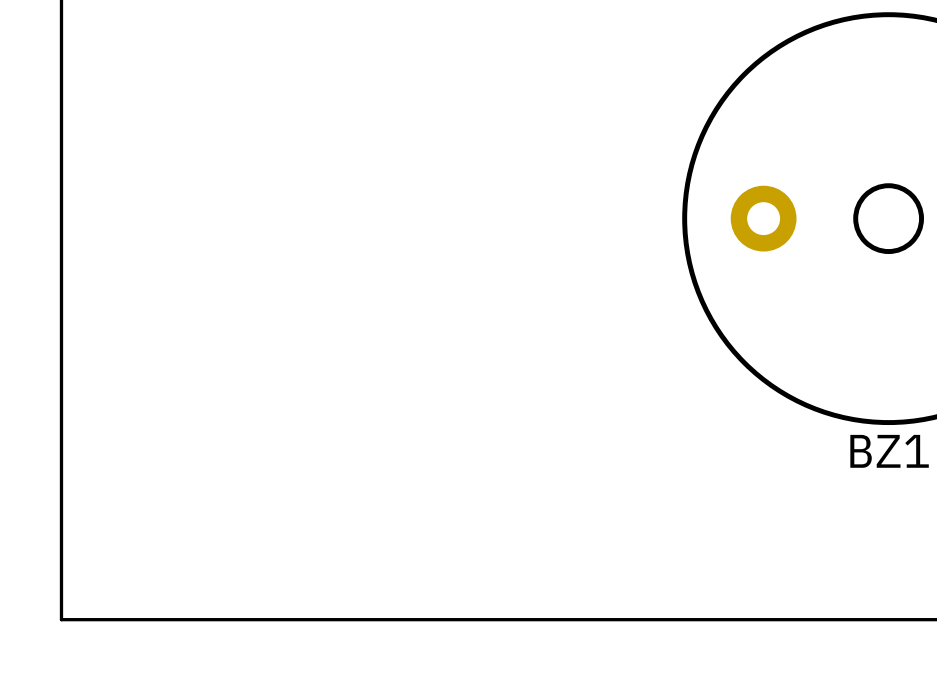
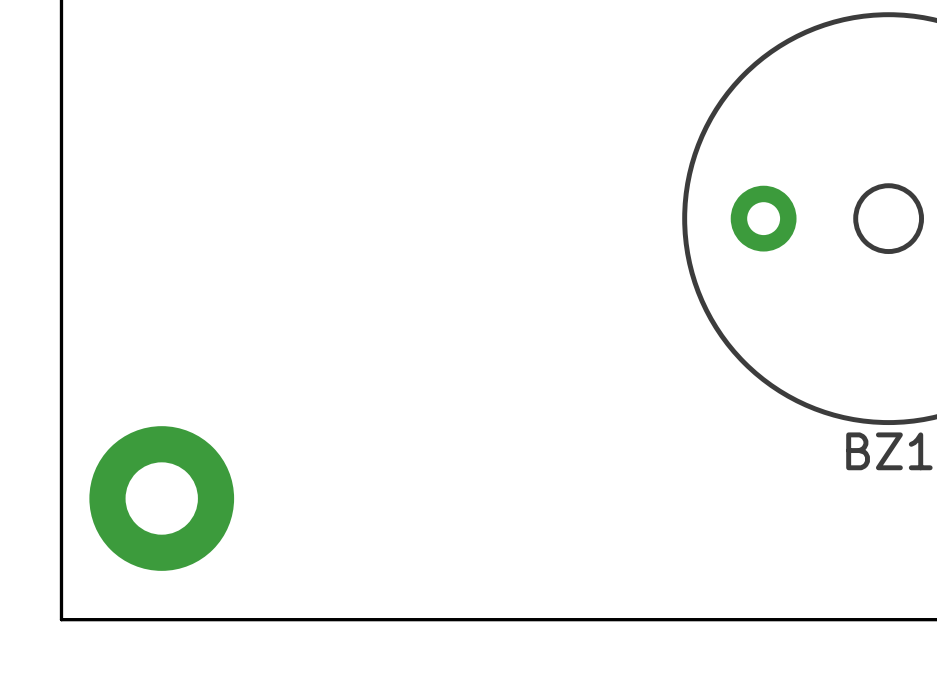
part: none -> (161, 498)

